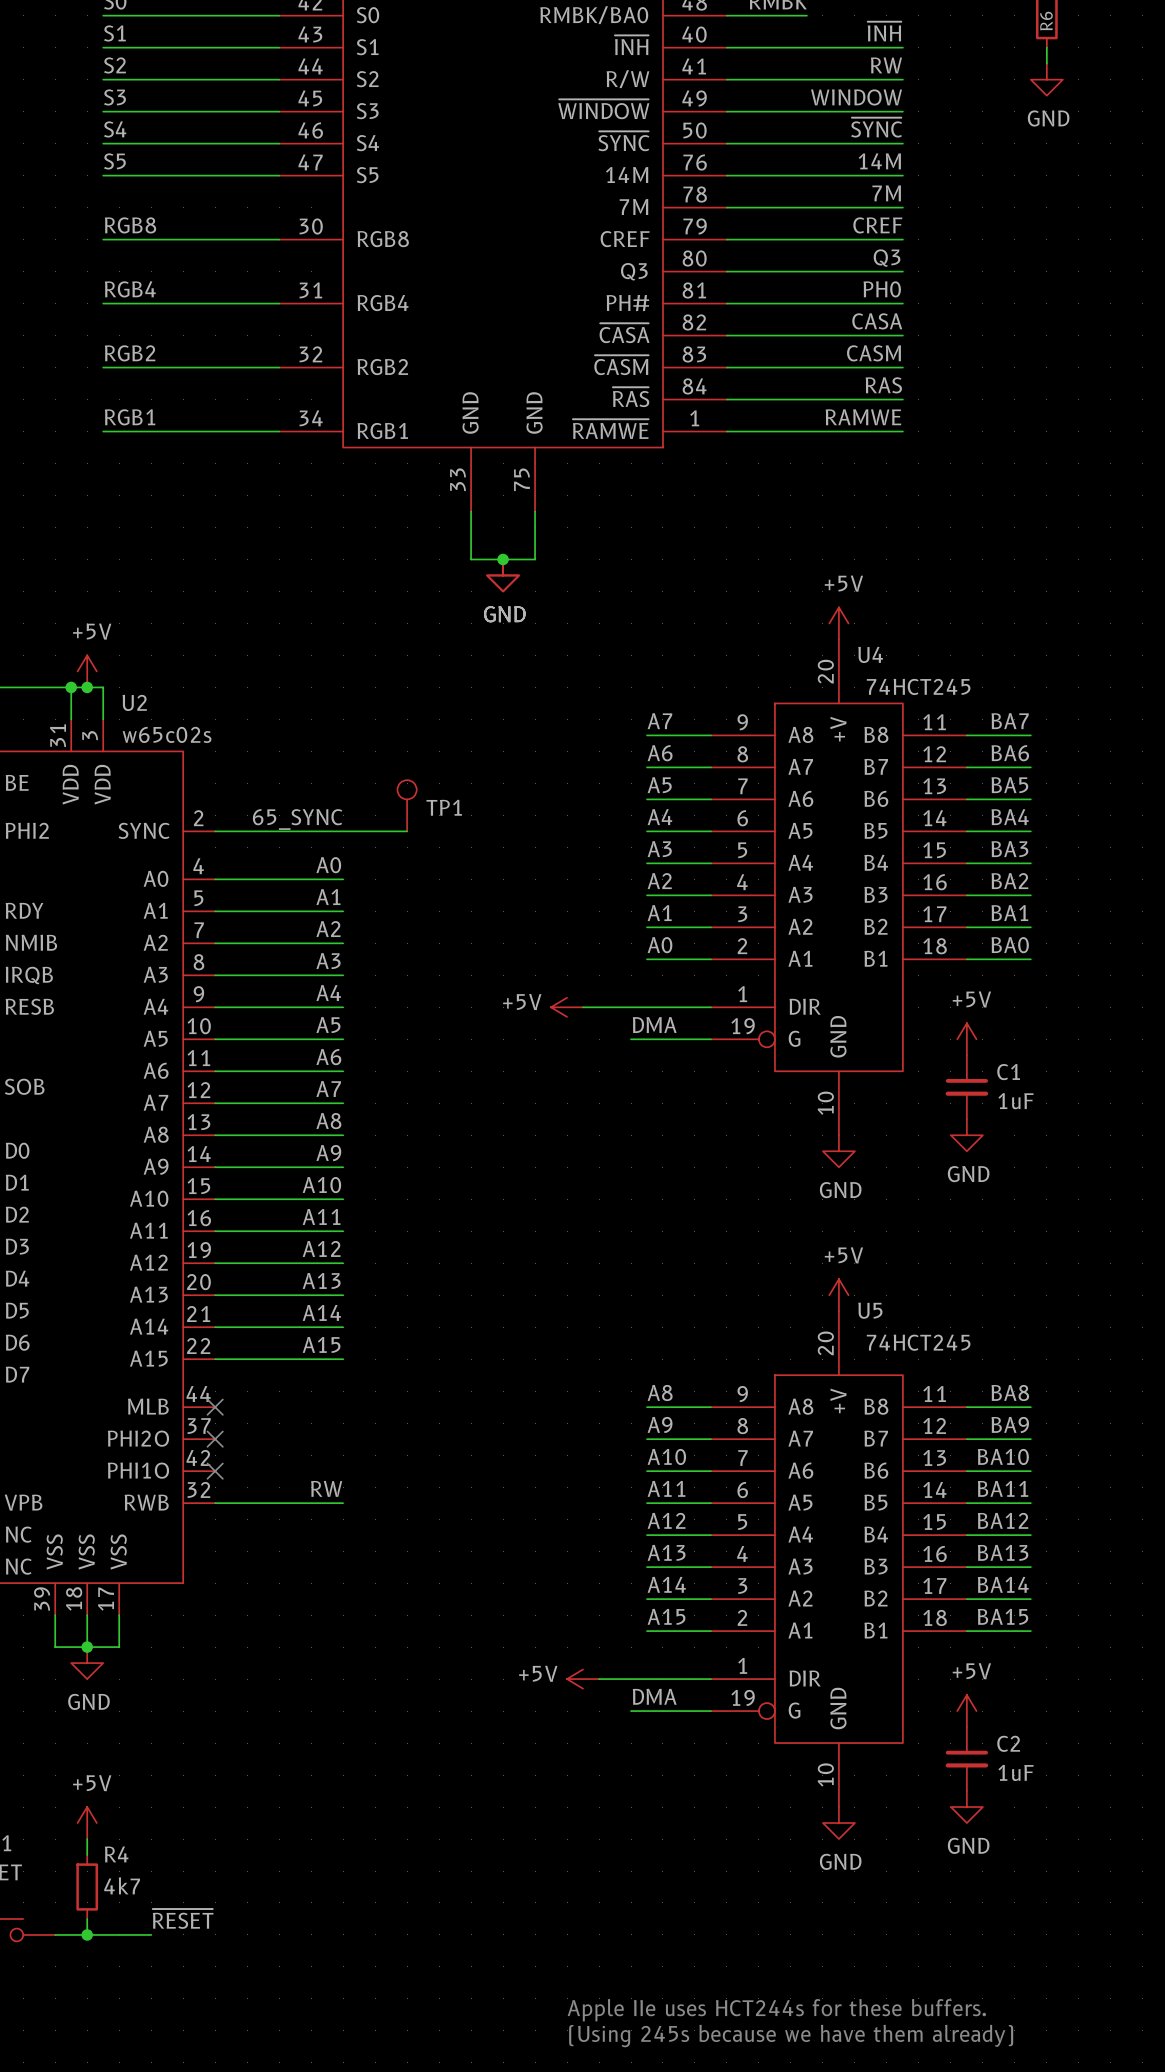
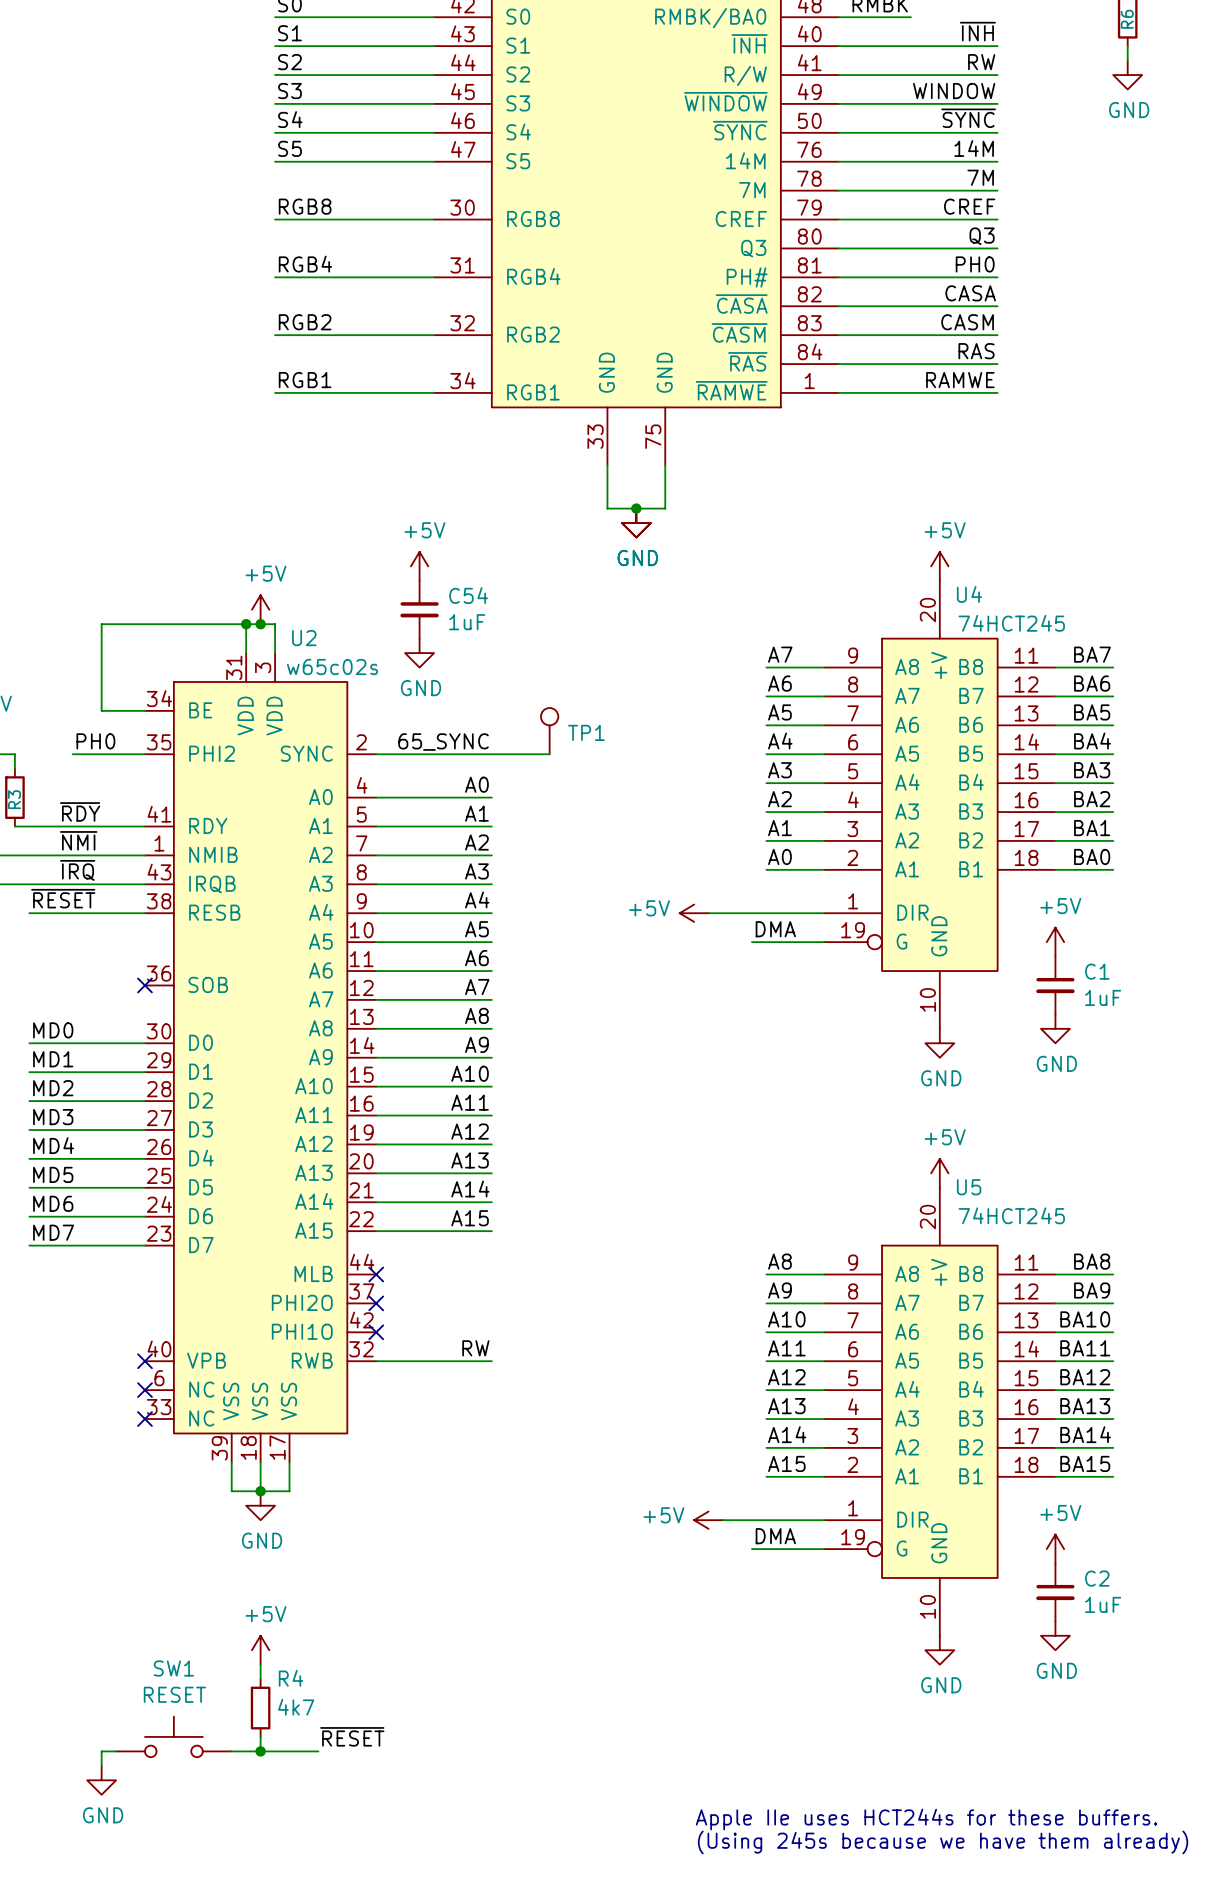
power symbol: none -> +5V (419, 566)
C54: none -> 1uF (419, 609)
power symbol: none -> GND (419, 653)

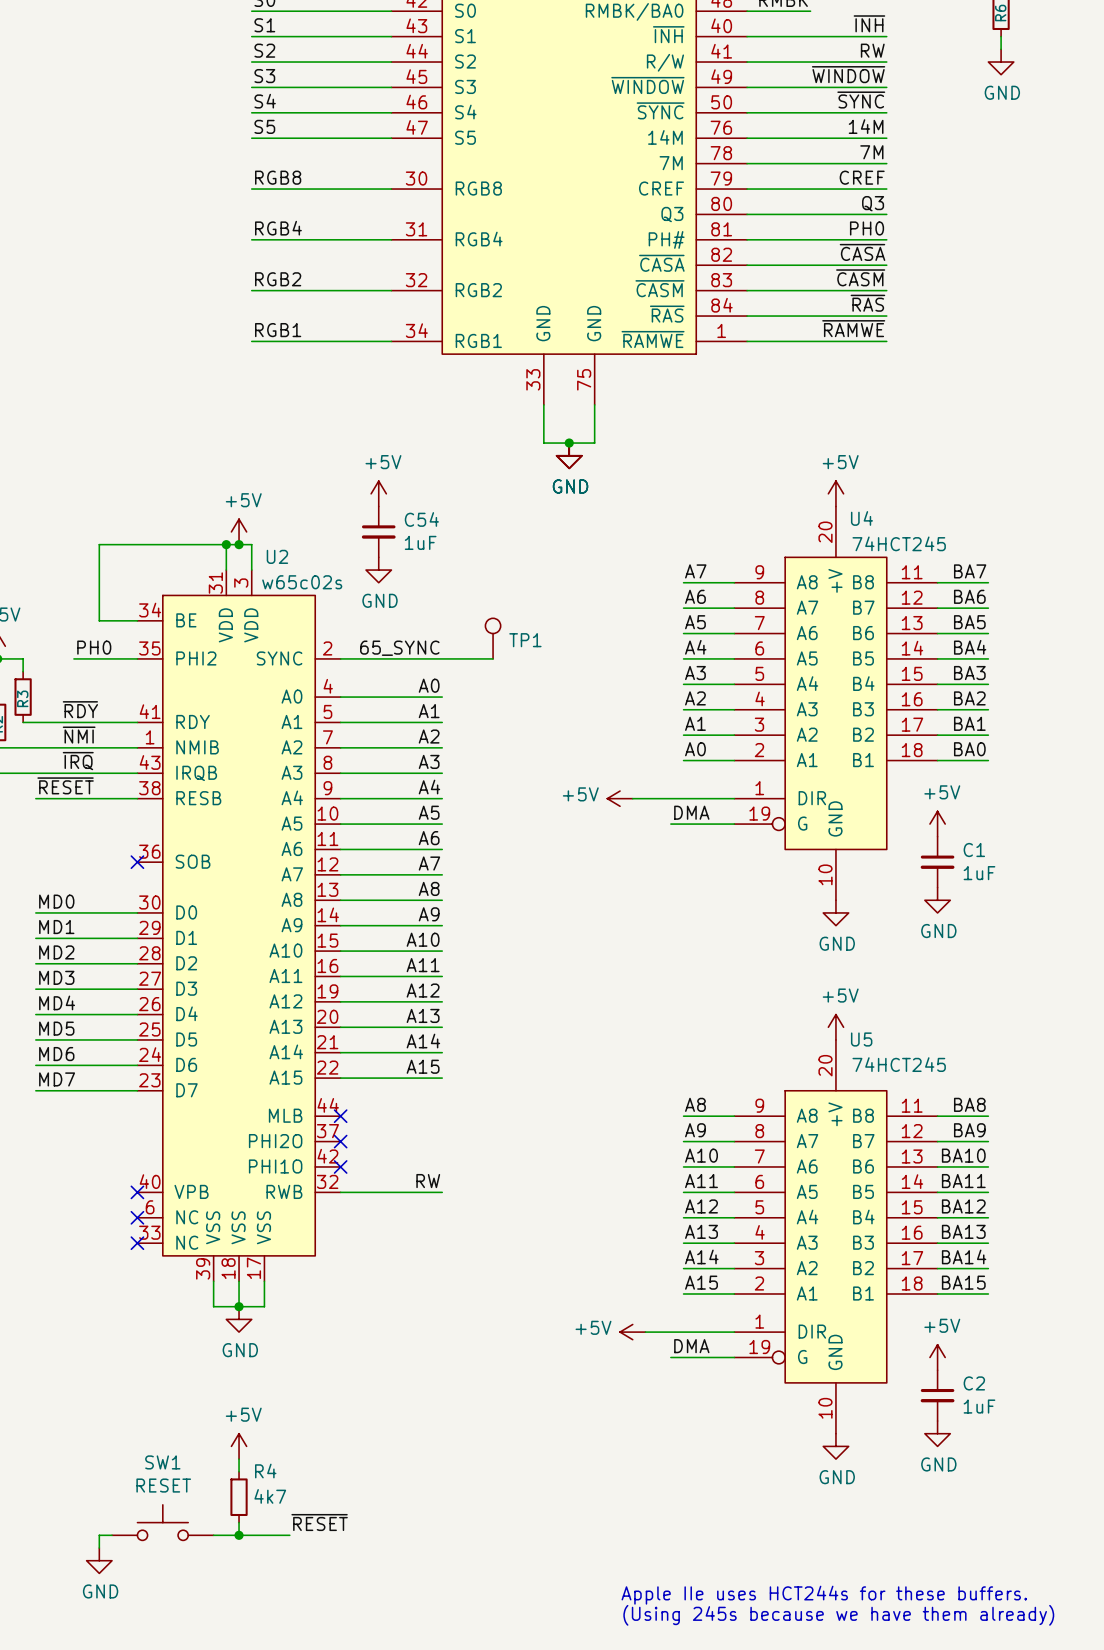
label: WINDOW (954, 91) -> ~{WINDOW} (848, 74)
label: CASA (970, 293) -> ~{CASA} (862, 252)
label: CASM (967, 322) -> ~{CASM} (860, 277)
label: RAS (976, 351) -> ~{RAS} (867, 303)
label: RAMWE (960, 380) -> ~{RAMWE} (853, 328)

